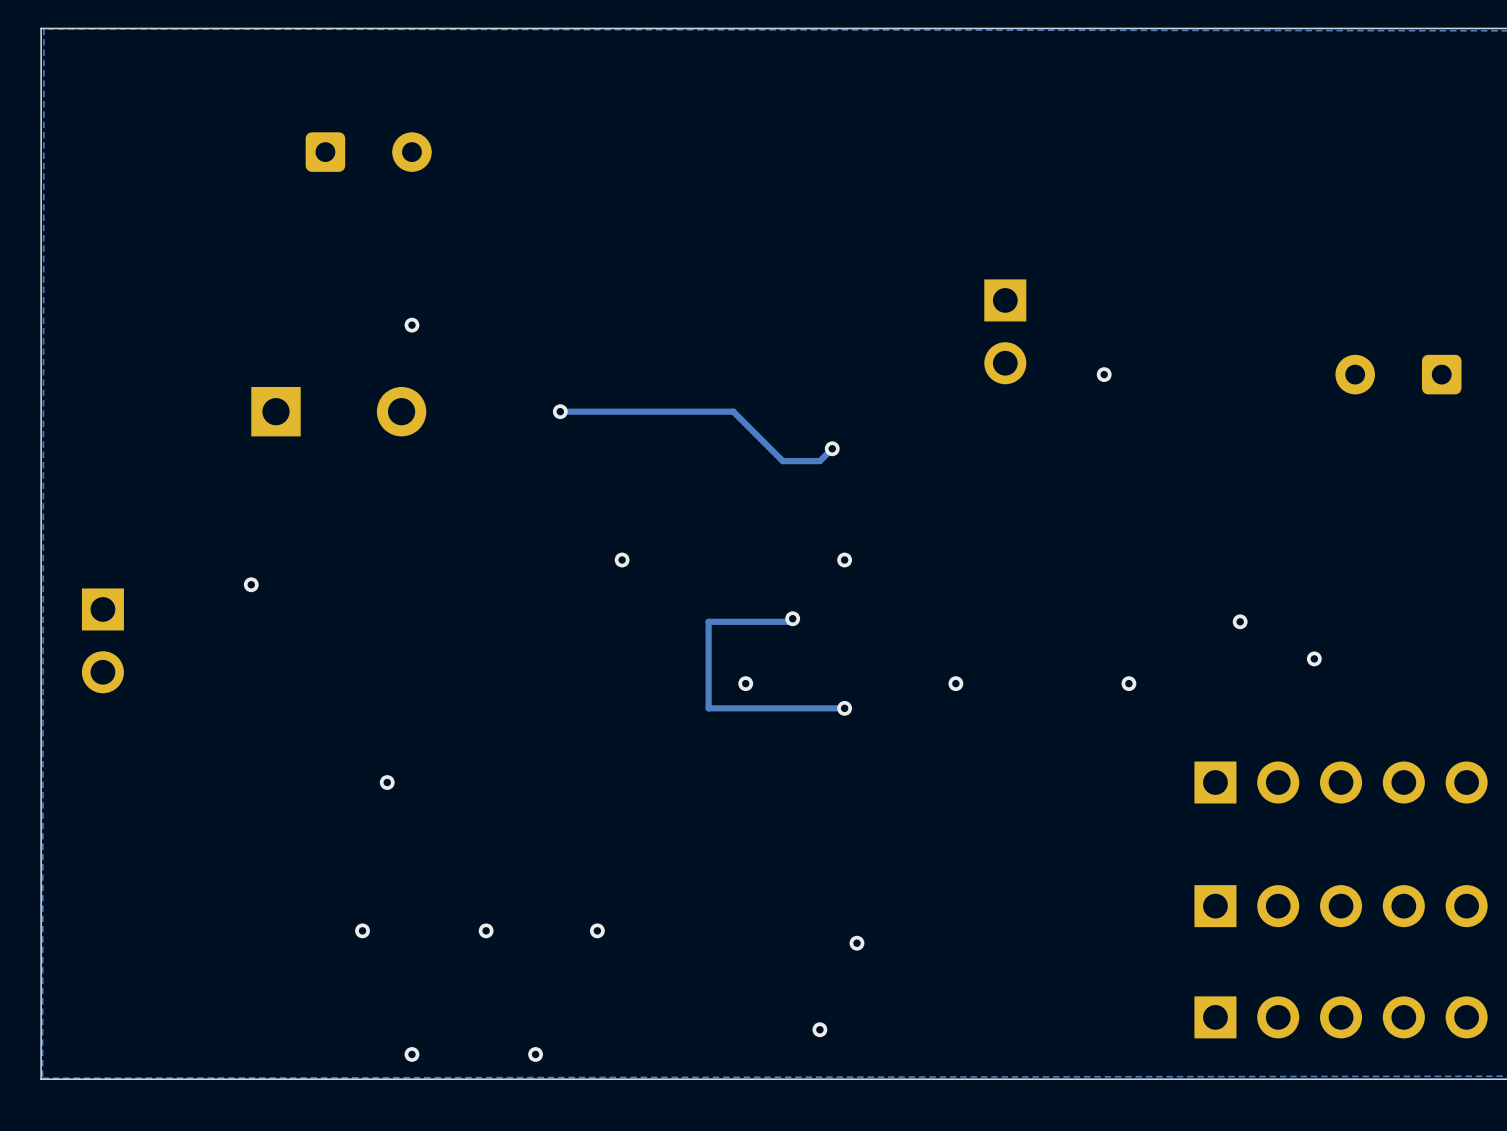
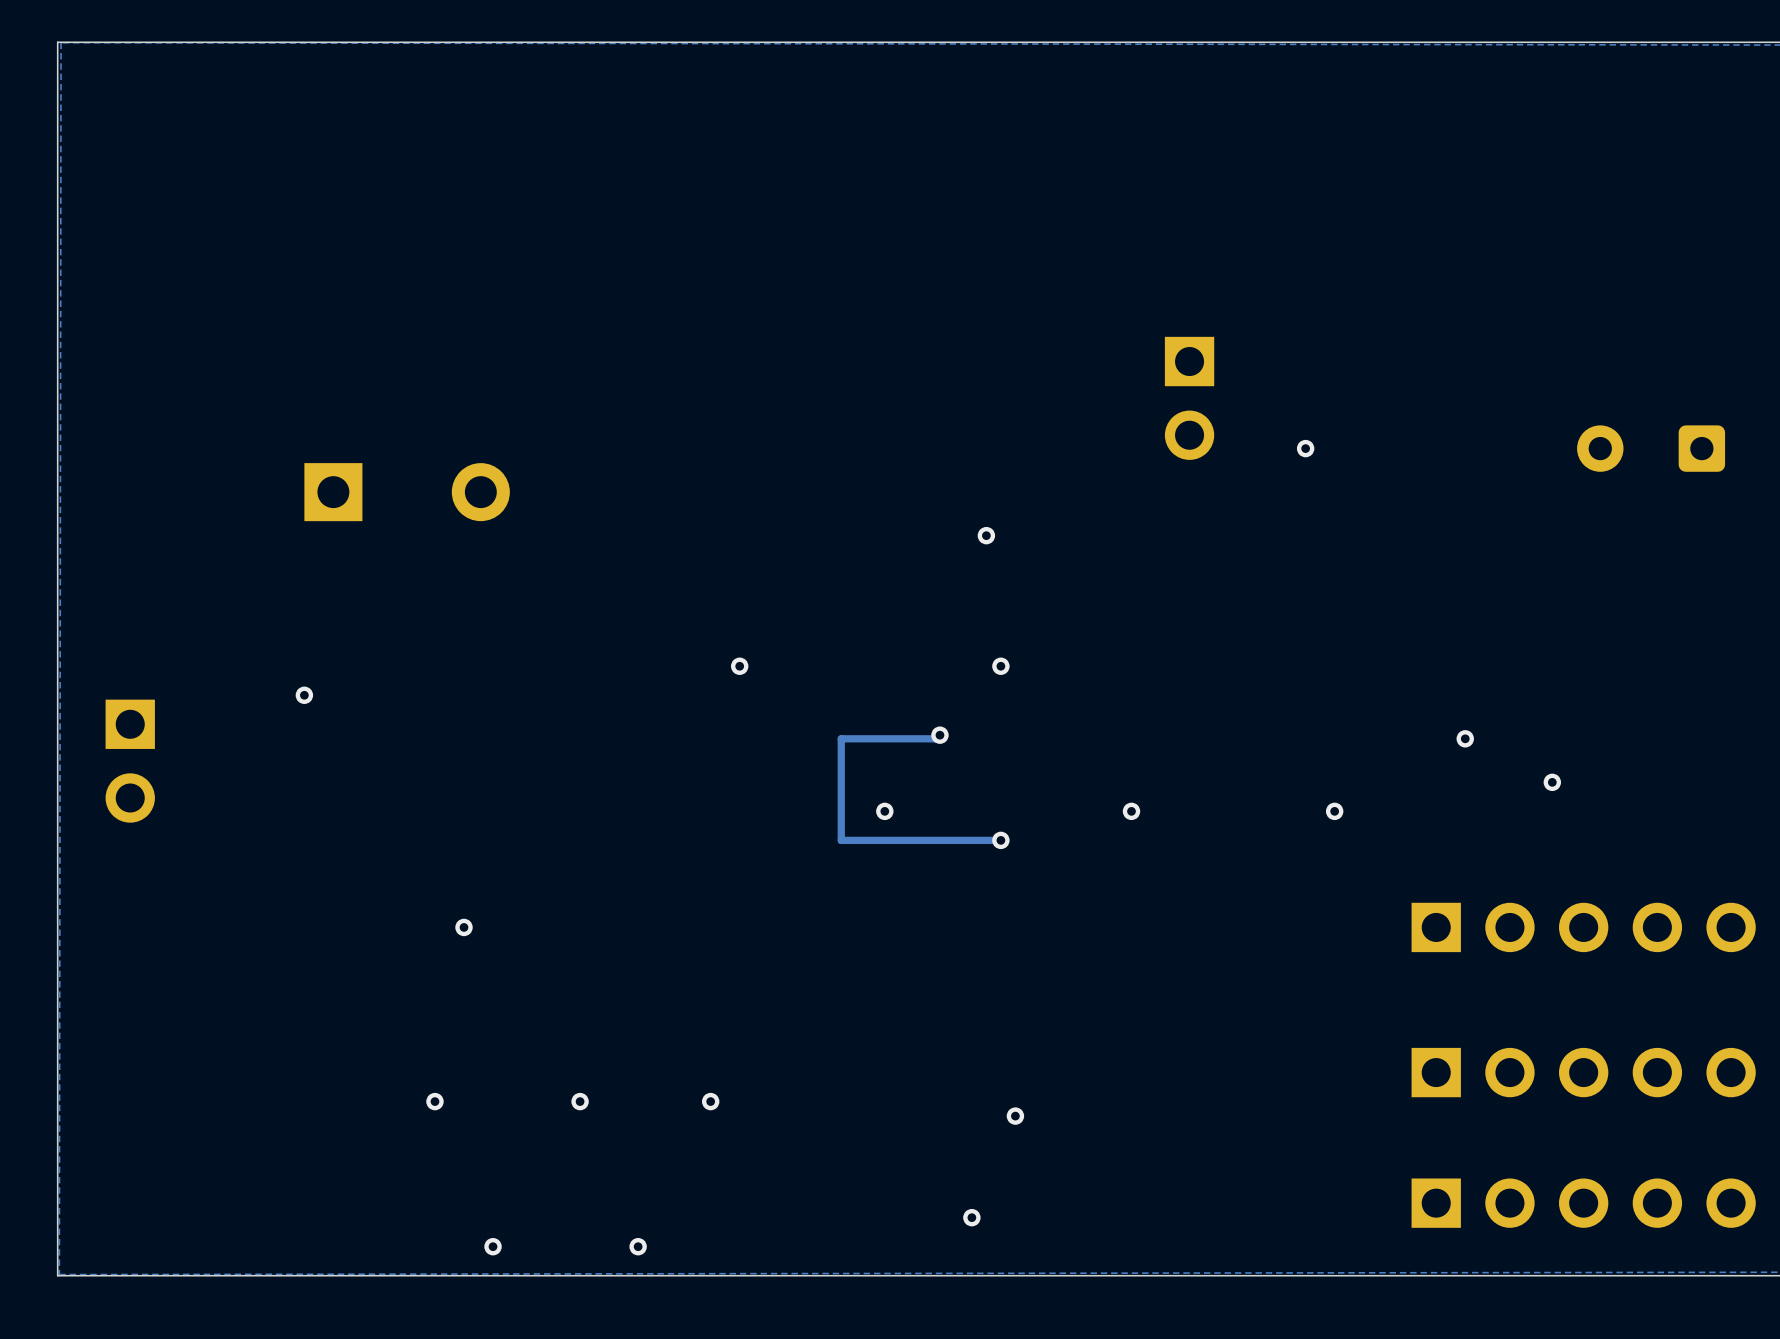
part: (368, 152) -> none
via: (411, 325) -> none
track: (560, 411) (733, 411) (782, 461) (819, 461) (832, 448) -> none
via: (560, 411) -> none

